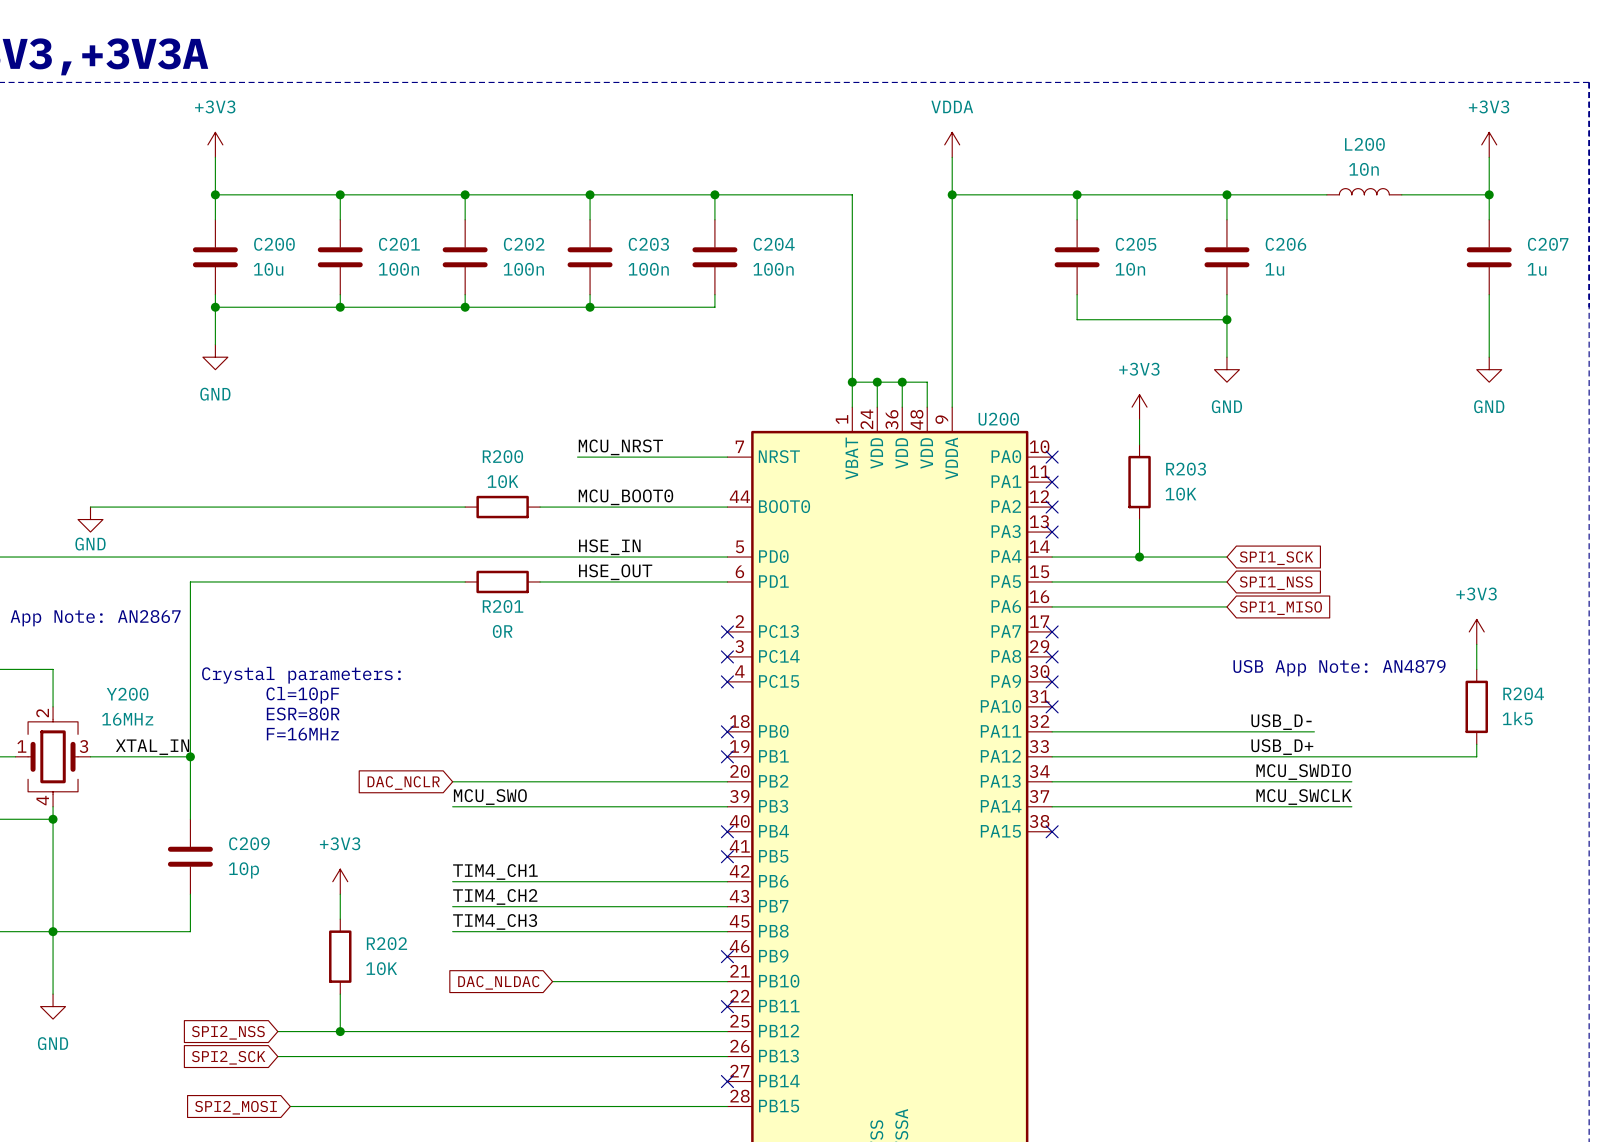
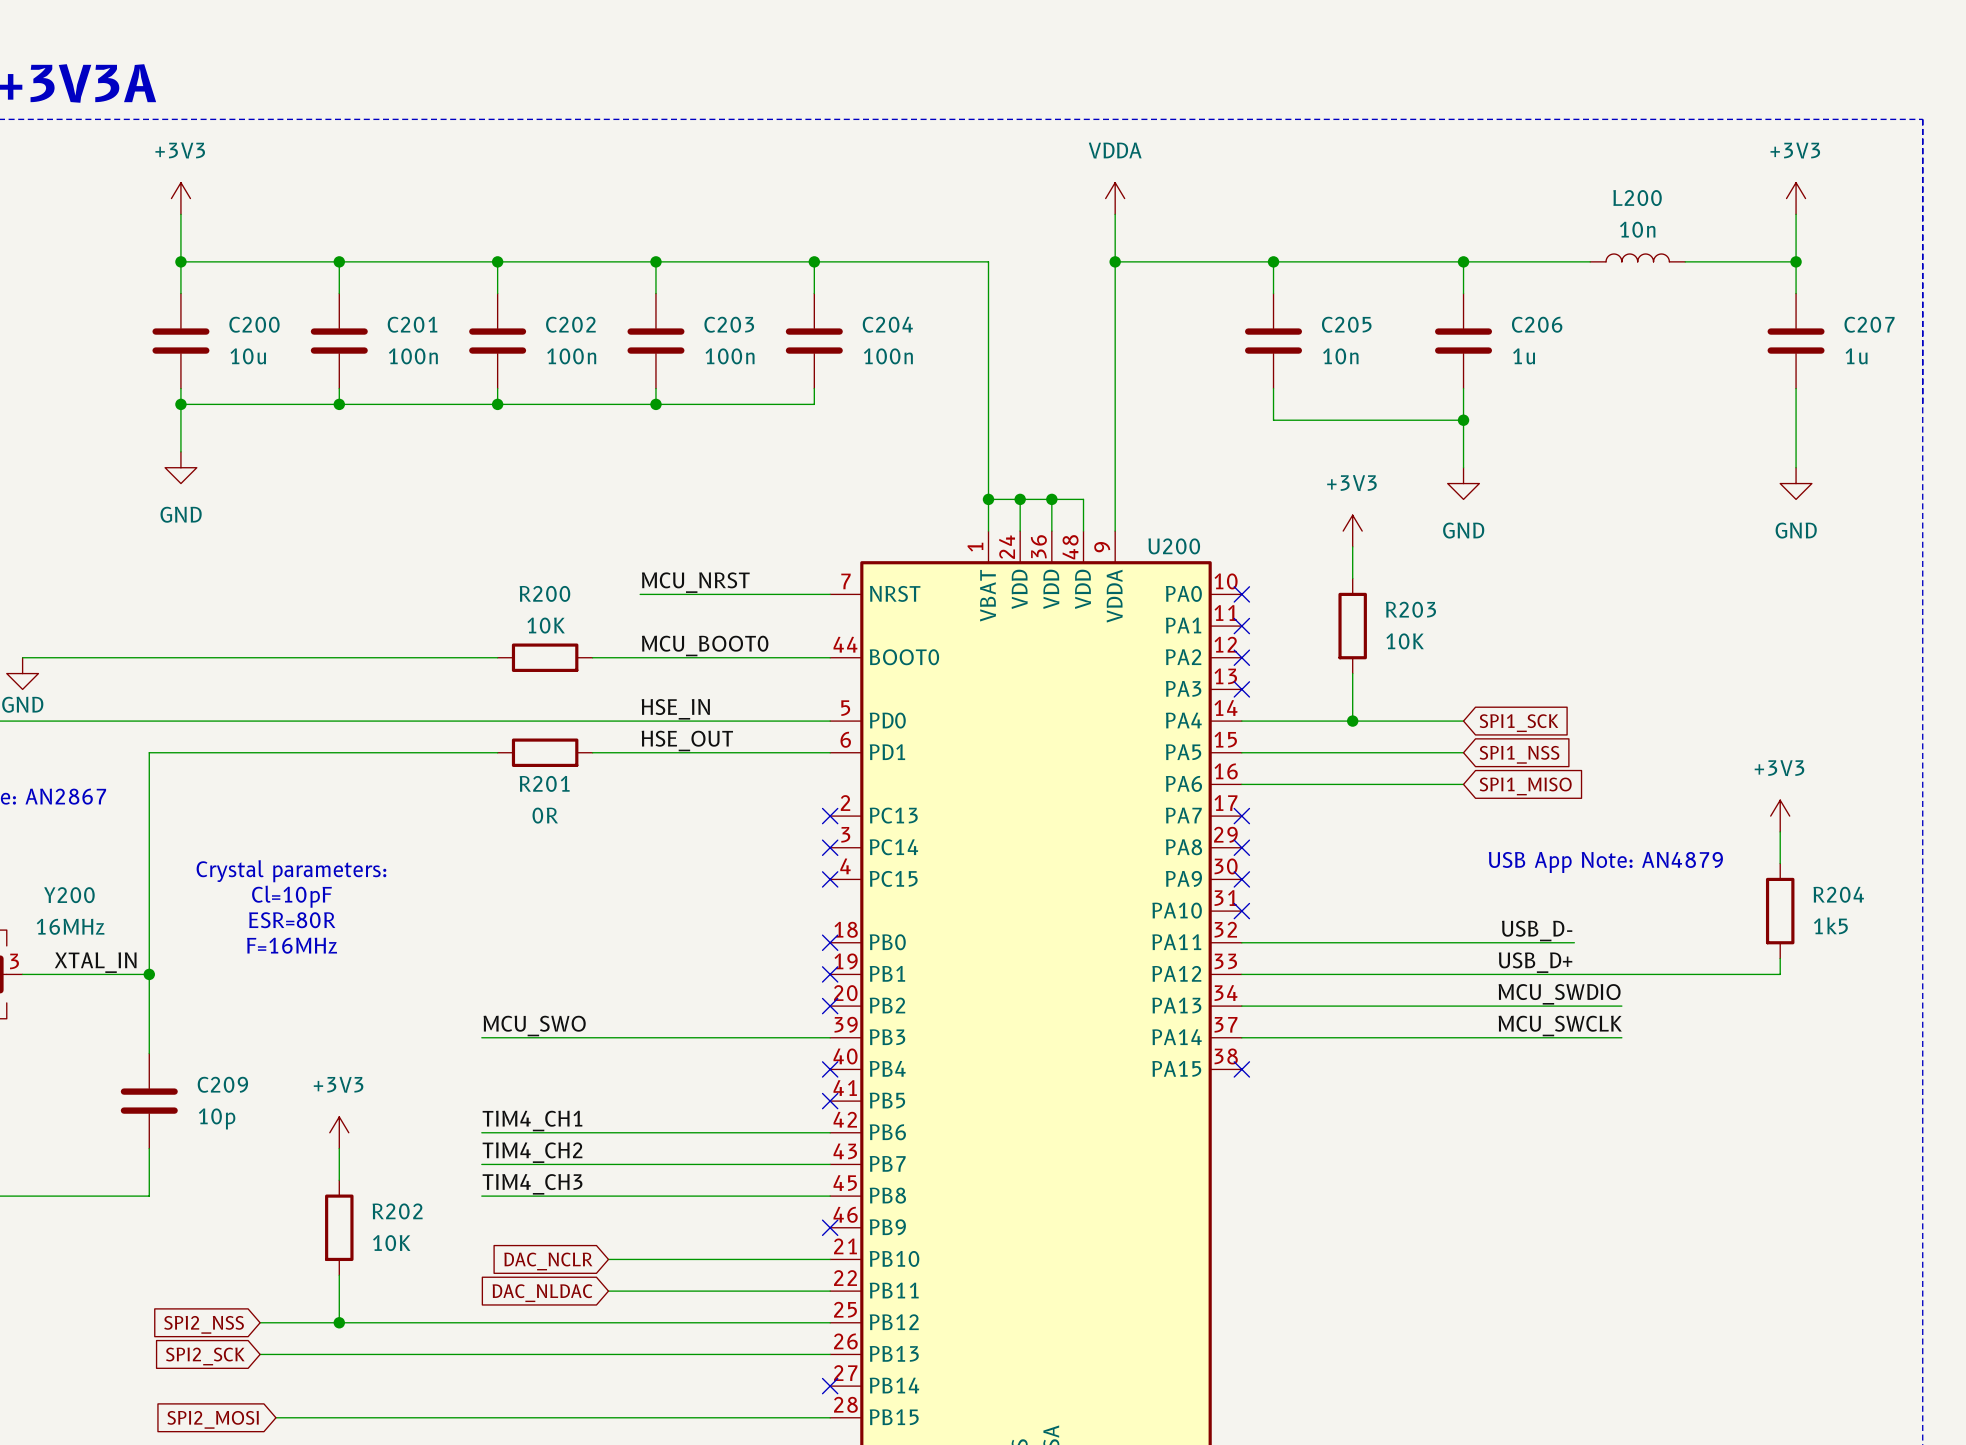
wire: (452, 781) (727, 781) -> none
no-connect mark: none -> (830, 1006)
global label: DAC_NCLR (403, 783) -> none
global label: DAC_NLDAC (498, 982) -> DAC_NCLR (548, 1261)
wire: none -> (608, 1291) (830, 1291)
no-connect mark: (727, 1006) -> none
global label: none -> DAC_NLDAC (542, 1293)

